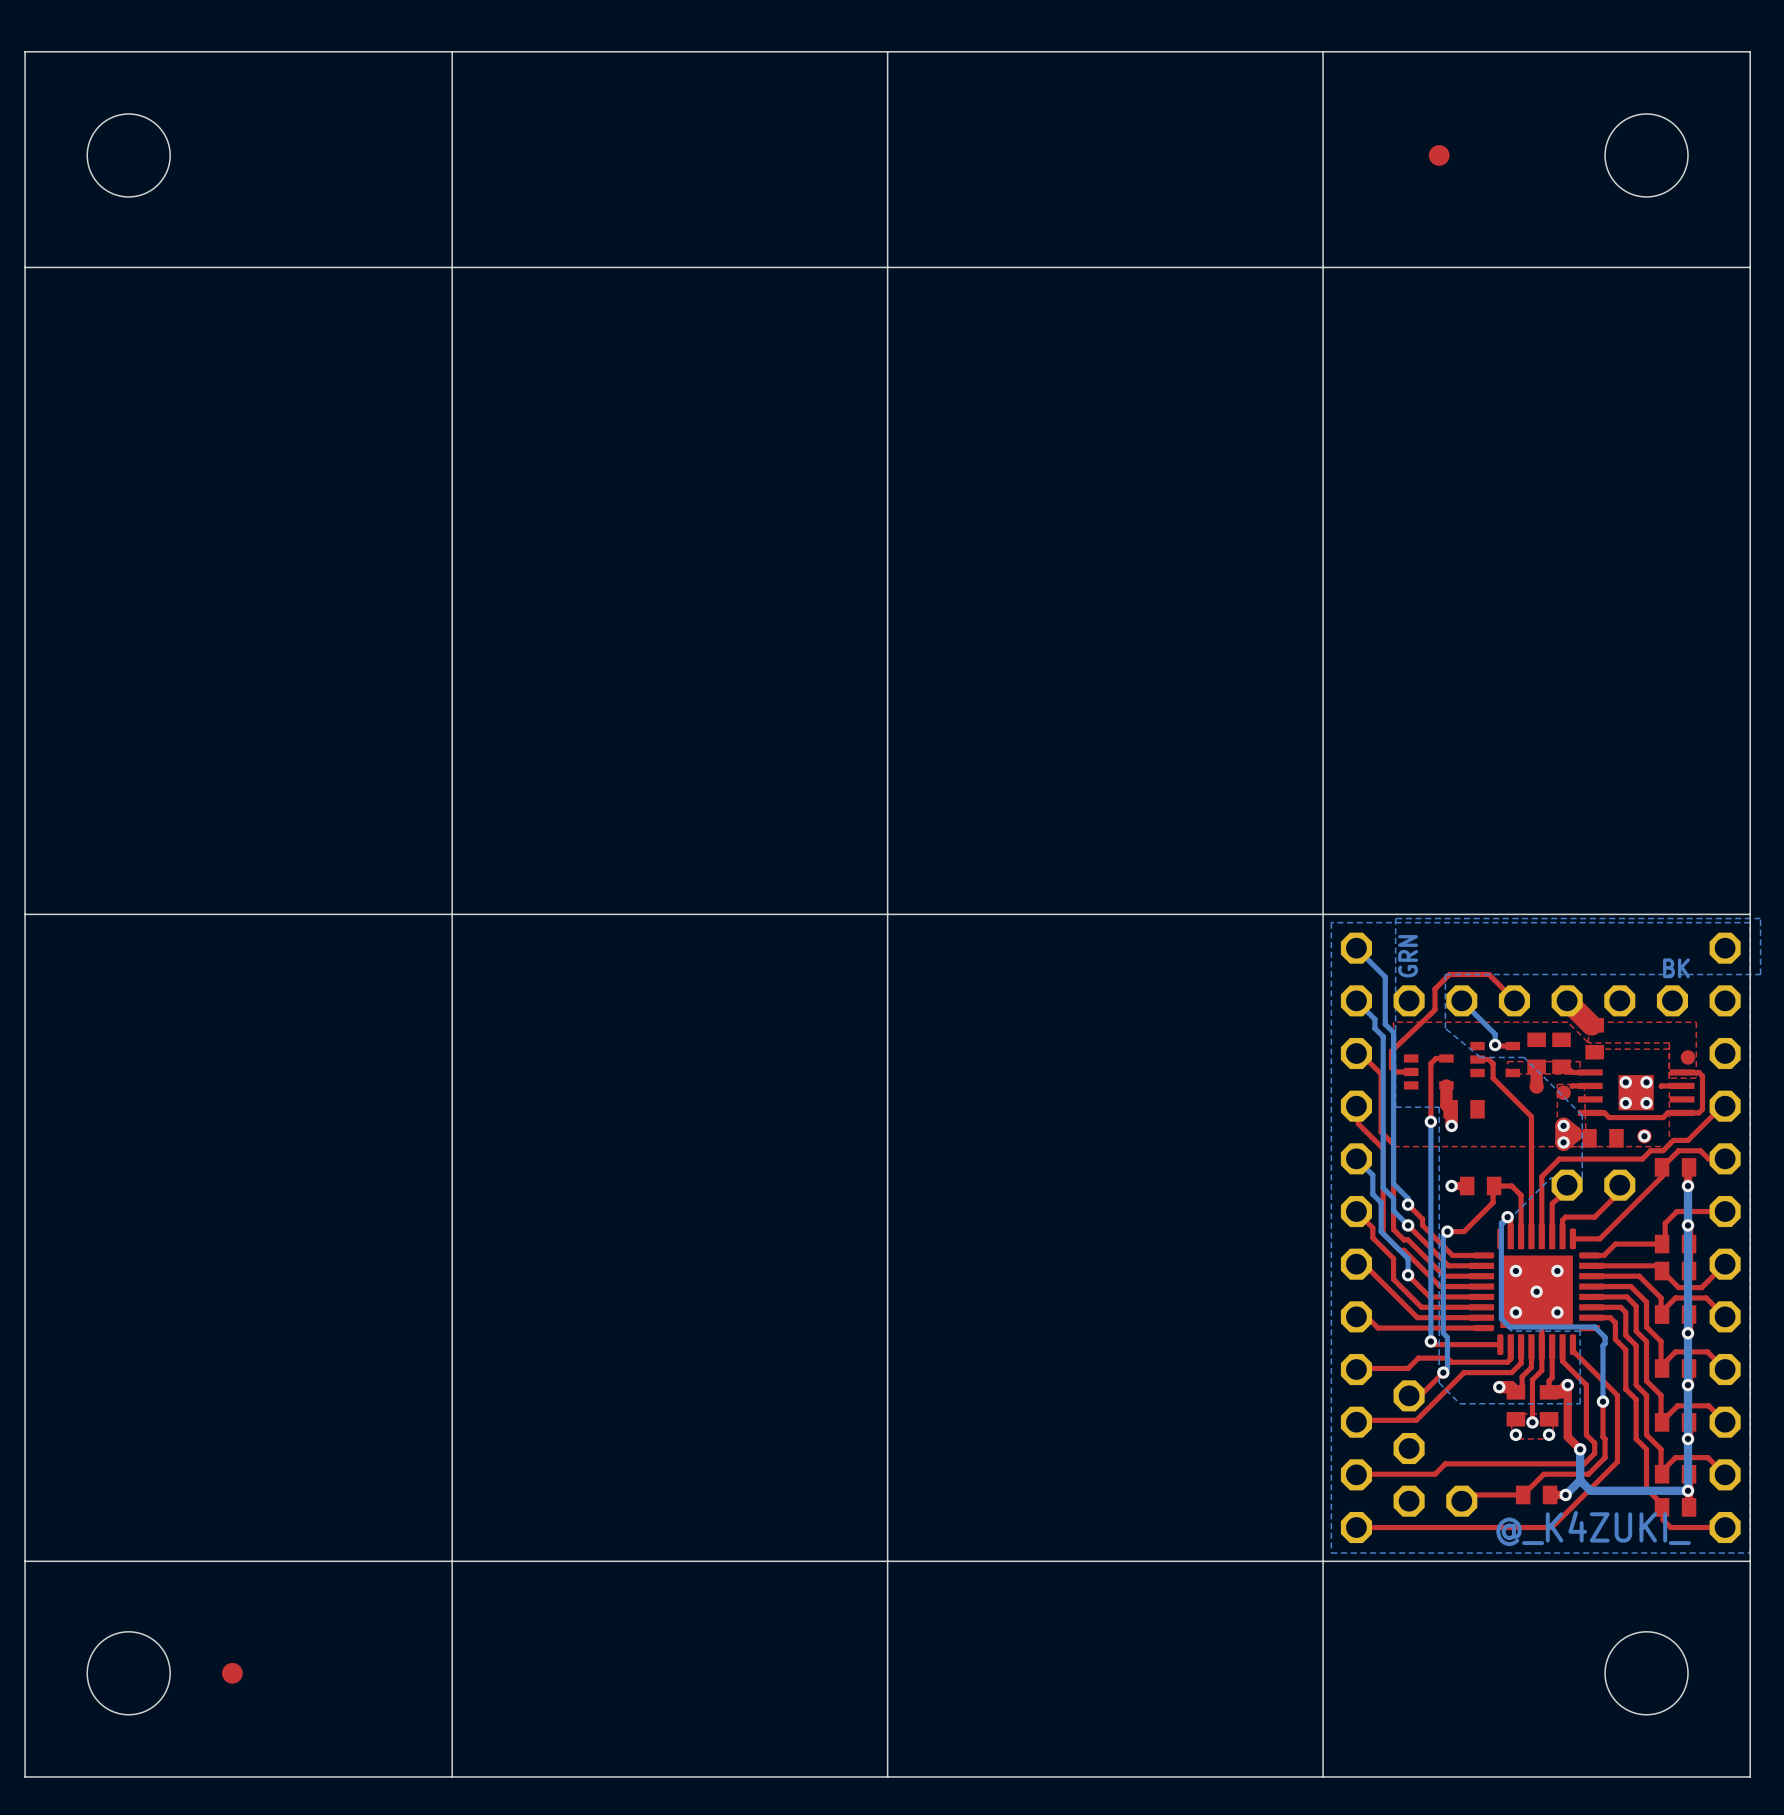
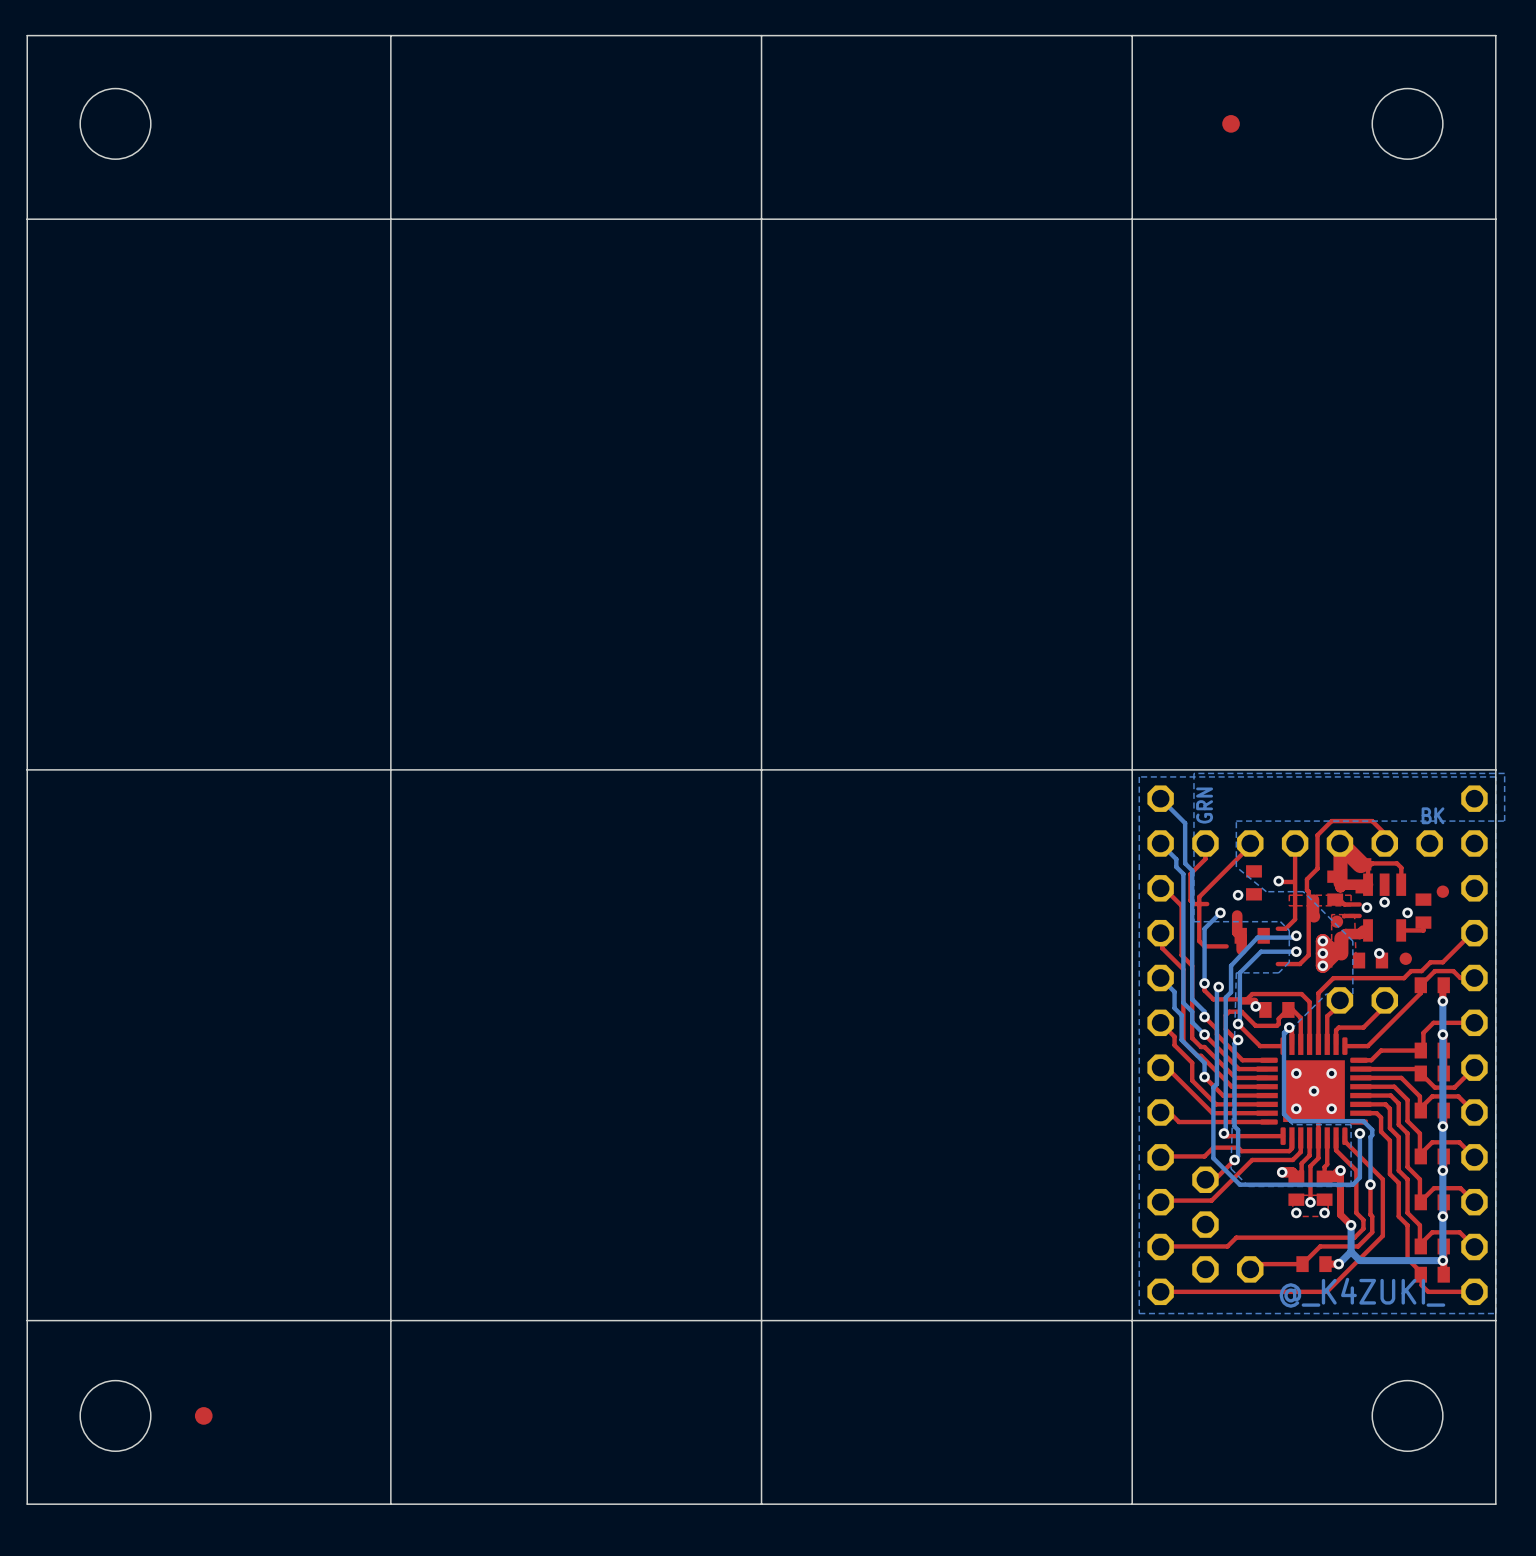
top track: none -> (1250, 843) (1250, 845) (1199, 896) (1199, 941) (1204, 946) (1226, 946)
bottom track: (1461, 1000) (1495, 1034) (1495, 1045) -> none
top track: (1514, 1000) (1488, 974) (1449, 974) (1435, 989) (1435, 1009) (1391, 1051) -> (1205, 843) (1205, 859) (1190, 874) (1190, 886)
top track: none -> (1295, 843) (1295, 919) (1285, 928) (1277, 928)
top track: none -> (1339, 843) (1340, 887) (1343, 884) (1368, 884) (1368, 867) (1372, 863) (1396, 863) (1401, 867) (1401, 884)
top track: none -> (1384, 843) (1384, 833) (1372, 821) (1331, 821) (1317, 835) (1317, 868) (1306, 879) (1308, 955) (1299, 964) (1277, 964)
part: none -> (1253, 882)
top zone outline: (1669, 1049) (1594, 1049) (1567, 1022) (1393, 1022) (1393, 1146) (1669, 1146) (1669, 1042) (1588, 1042) (1588, 1022) (1696, 1022) (1696, 1078) (1669, 1078) -> none
part: (1536, 1053) -> none
top track: (1446, 1058) (1436, 1058) (1430, 1063) (1430, 1121) -> none
top track: (1477, 1059) (1488, 1059) (1493, 1063) (1493, 1078) (1531, 1116) (1531, 1187) -> (1204, 983) (1204, 990) (1213, 999) (1246, 999) (1252, 994) (1301, 994) (1309, 1002)
part: (1495, 1059) -> none
via: none -> (1238, 895)
via: none -> (1384, 902)
part: (1428, 1071) -> none
top track: (1682, 1072) (1698, 1072) (1702, 1076) (1702, 1109) (1698, 1112) (1667, 1112) (1663, 1117) (1609, 1117) (1604, 1112) (1590, 1112) -> none
via: none -> (1366, 907)
part: none -> (1384, 907)
part: none -> (1423, 911)
bottom track: none -> (1220, 912) (1204, 928) (1204, 983)
via: none -> (1220, 912)
via: (1625, 1082) -> none
top track: (1682, 1085) (1661, 1086) -> none
bottom zone outline: (1395, 1092) (1395, 1107) (1439, 1107) (1439, 1382) -> (1193, 921) (1280, 921) (1289, 930) (1289, 962) (1278, 972) (1236, 972) (1231, 1168)
part: (1636, 1092) -> none
top track: none -> (1423, 922) (1423, 930) (1401, 930)
top track: none -> (1368, 930) (1363, 930) (1359, 934) (1345, 934) (1341, 938) (1341, 953) (1335, 953)
via: (1625, 1103) -> none
via: (1646, 1103) -> none
bottom track: none -> (1296, 935) (1294, 937) (1257, 937) (1231, 965) (1231, 992) (1225, 997) (1225, 1133)
via: none -> (1296, 935)
via: none -> (1322, 941)
bottom track: (1430, 1121) (1430, 1341) -> none
via: (1430, 1121) -> none
via: (1451, 1125) -> none
top track: (1563, 1125) (1563, 1142) (1573, 1134) (1563, 1125) -> none
via: (1563, 1125) -> none
bottom track: none -> (1296, 951) (1261, 951) (1239, 972) (1239, 1022) (1238, 1024)
via: none -> (1296, 951)
via: none -> (1322, 953)
top track: none -> (1335, 953) (1322, 941) (1322, 965) (1335, 953)
via: none -> (1379, 953)
via: (1644, 1136) -> none
via: (1563, 1142) -> none
via: none -> (1322, 965)
via: none -> (1204, 983)
bottom track: none -> (1218, 987) (1216, 988) (1216, 1084) (1213, 1087) (1213, 1158) (1239, 1184) (1352, 1184) (1359, 1177) (1359, 1133)
via: none -> (1218, 987)
via: (1451, 1186) -> none
part position: (1480, 1186) -> (1276, 1009)
via: none -> (1255, 1006)
top track: (1521, 1205) (1521, 1195) (1511, 1186) (1494, 1186) (1493, 1202) (1464, 1231) (1447, 1231) -> (1300, 1017) (1292, 1009) (1287, 1009) (1278, 1018) (1276, 1025) (1255, 1025) (1241, 1011) (1229, 1011) (1225, 1015) (1225, 1029) (1238, 1039)
top track: none -> (1238, 1024) (1260, 1046) (1283, 1046)
via: none -> (1238, 1024)
via: none -> (1359, 1133)

